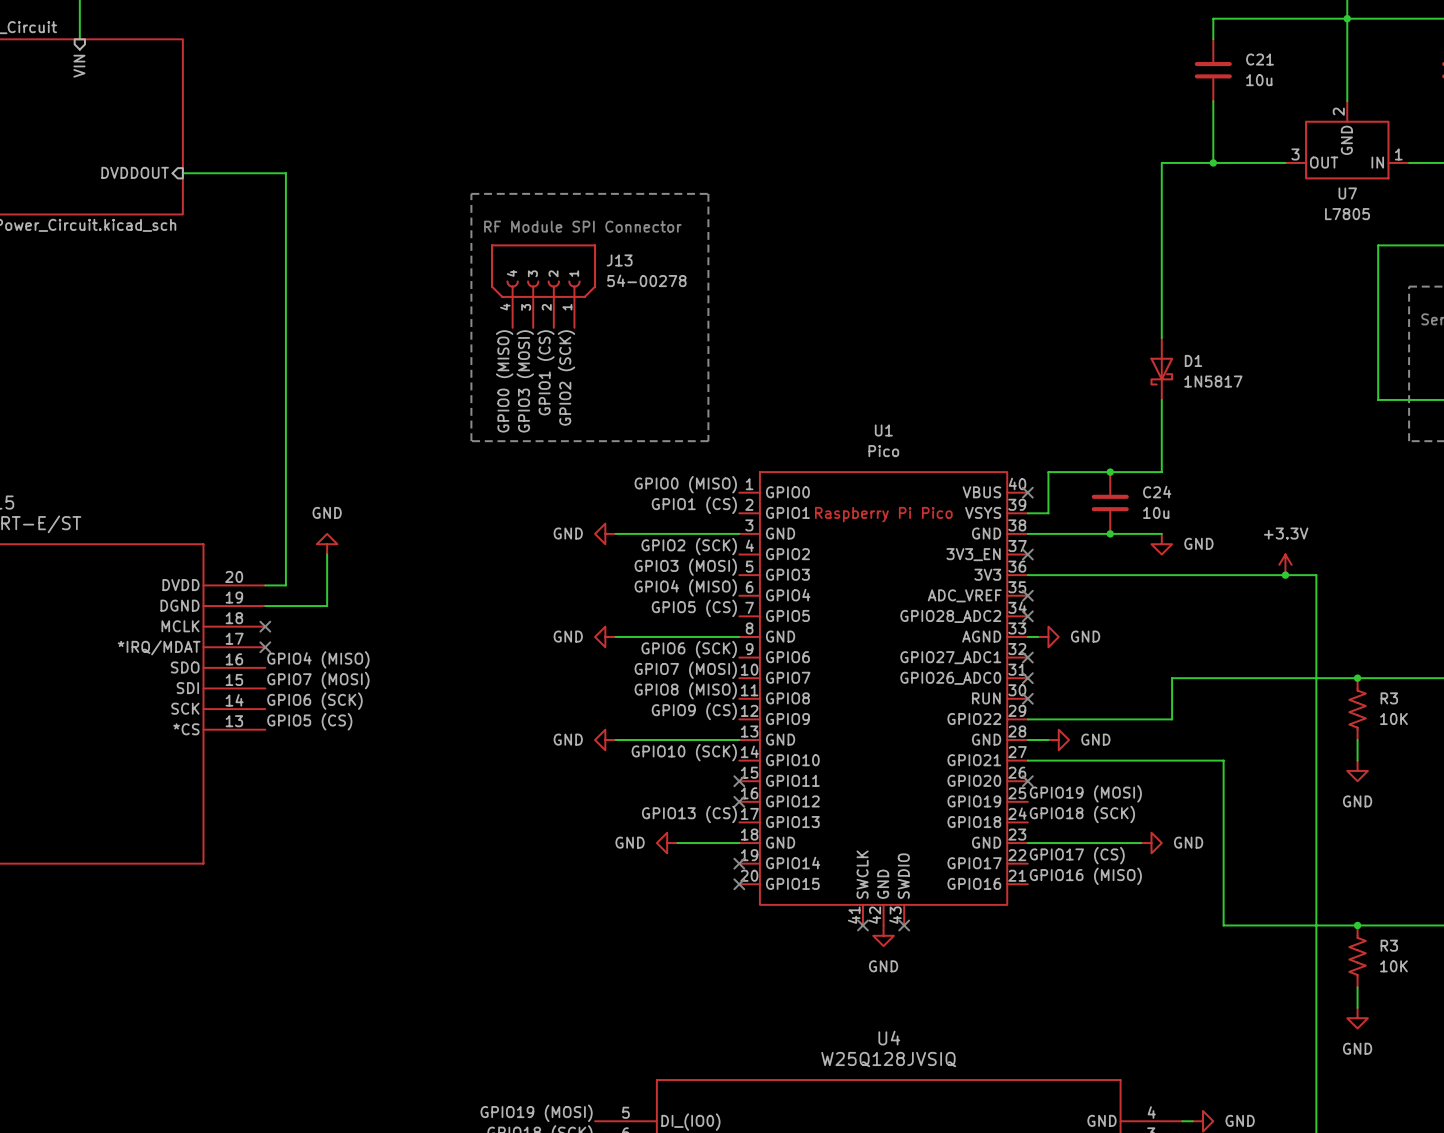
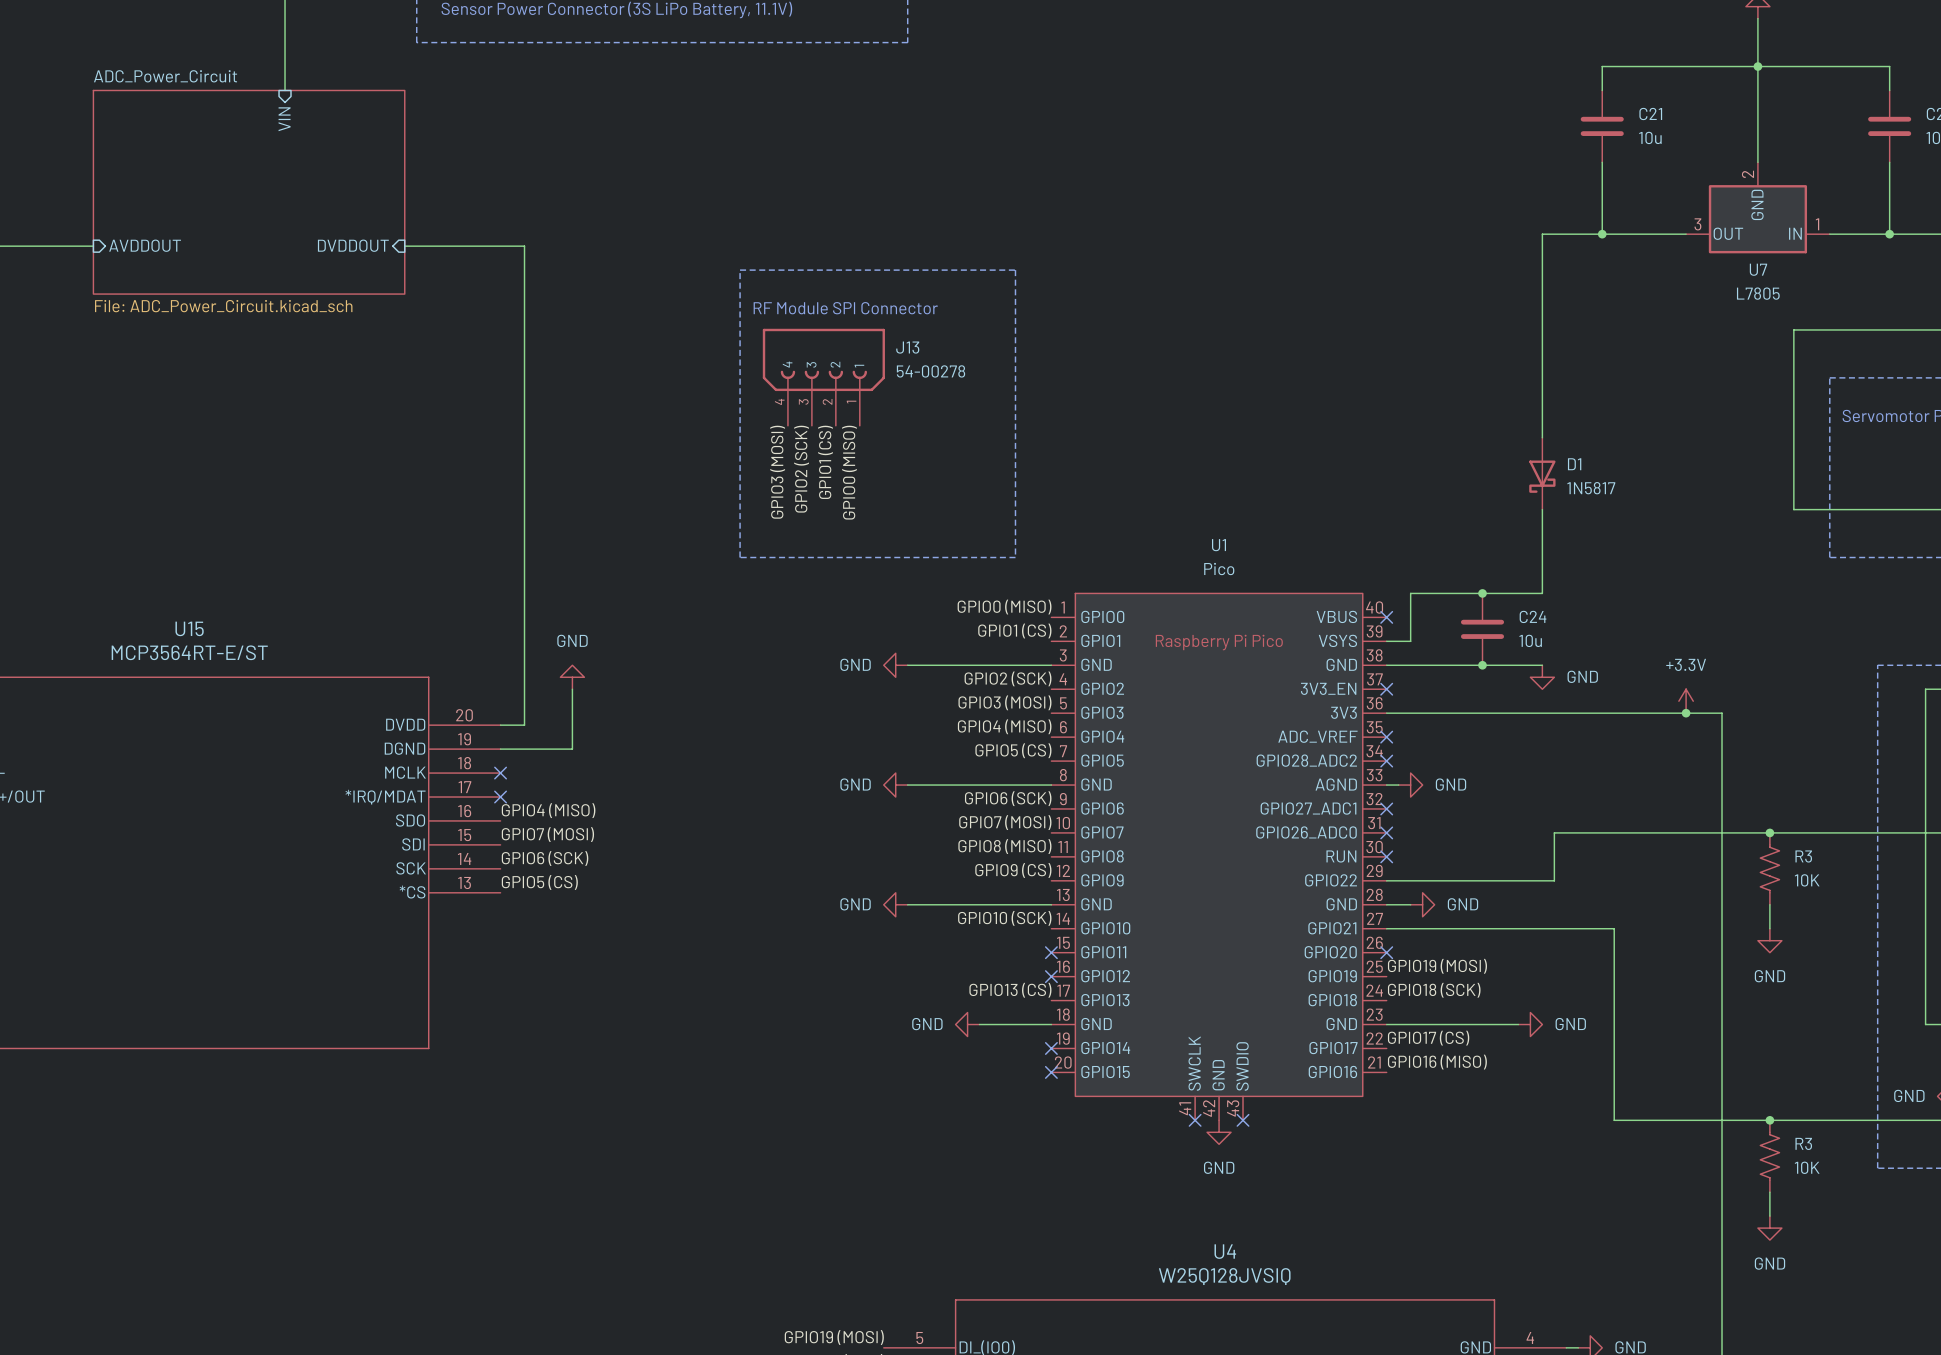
label: GPIO2 (SCK) (566, 377) -> GPIO0 (MISO) (849, 472)
label: GPIO0 (MISO) (504, 381) -> GPIO3 (MOSI) (777, 472)
label: GPIO3 (MOSI) (525, 381) -> GPIO2 (SCK) (801, 469)

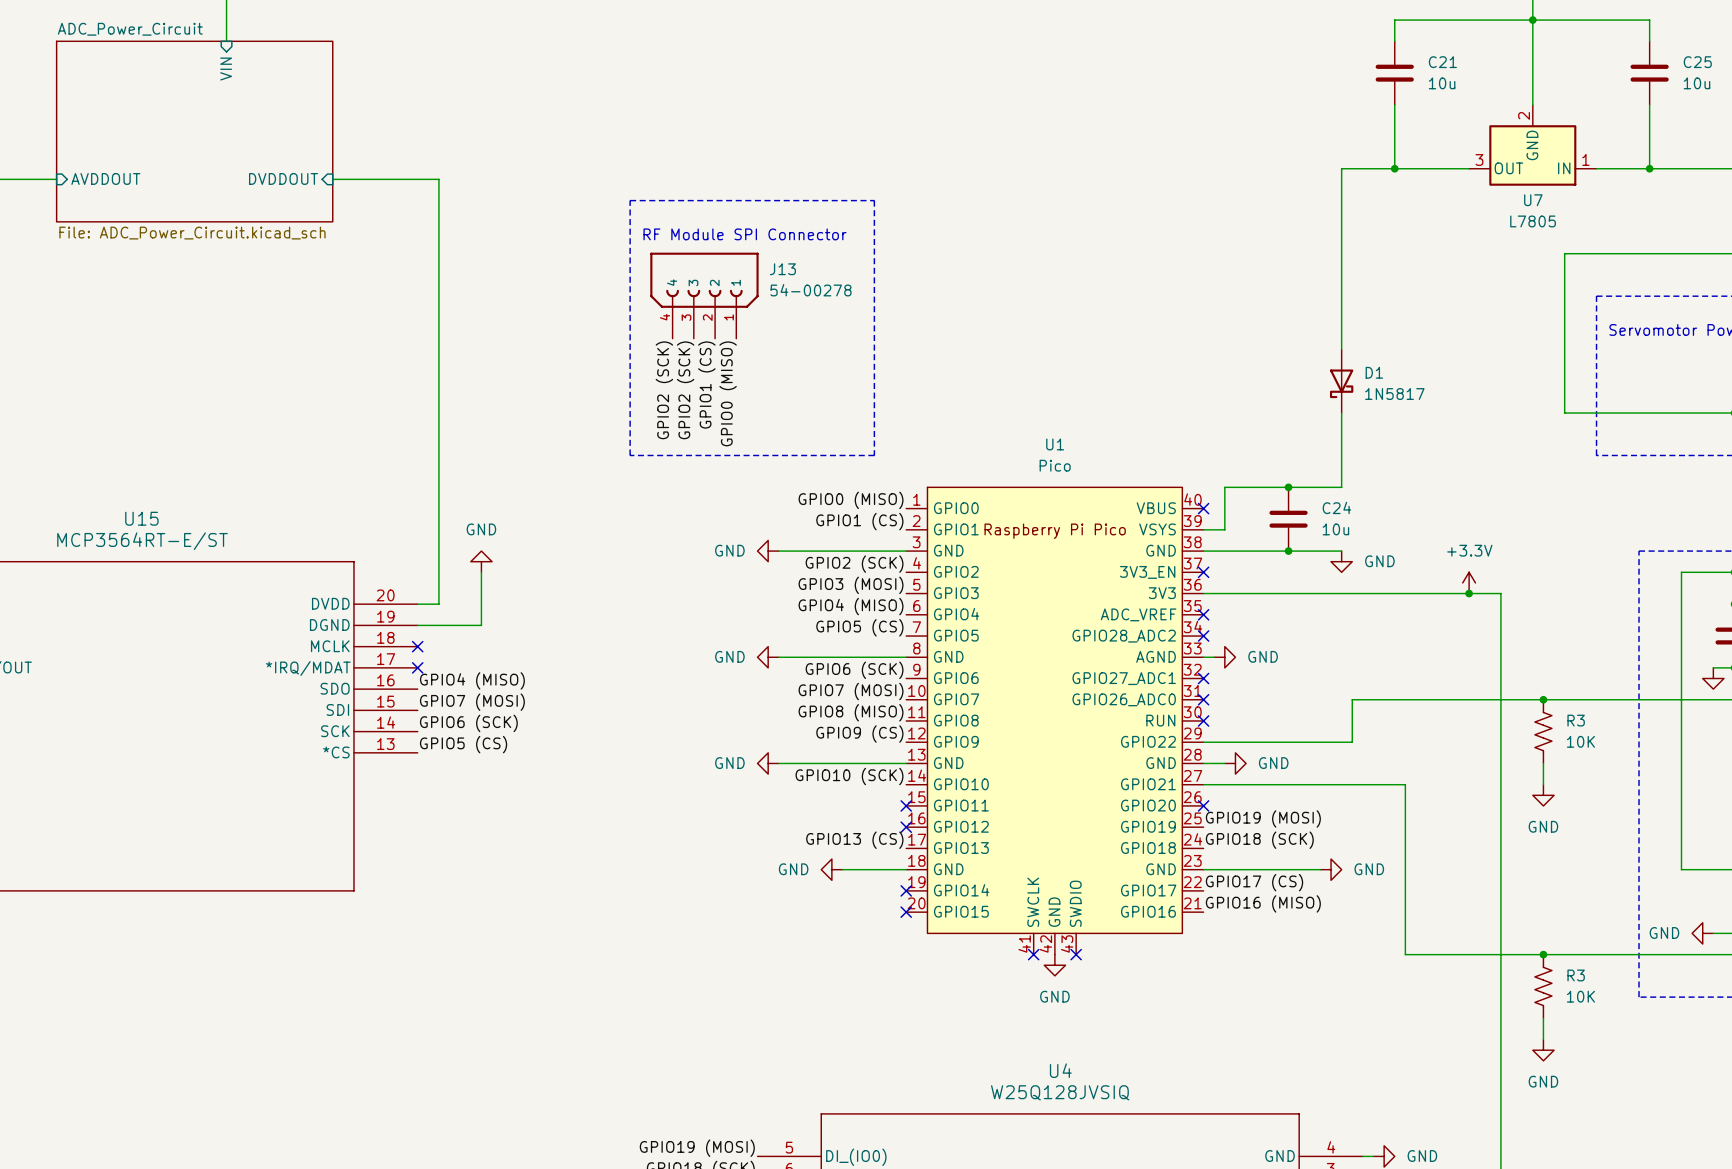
label: GPIO3 (MOSI) (777, 472) -> GPIO2 (SCK) (664, 390)

